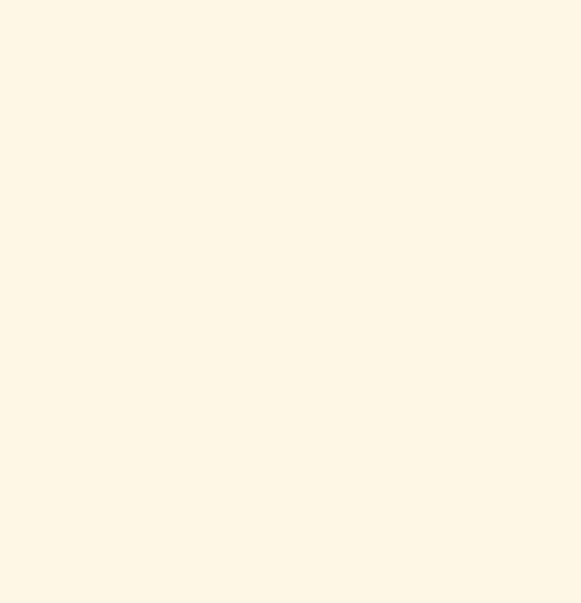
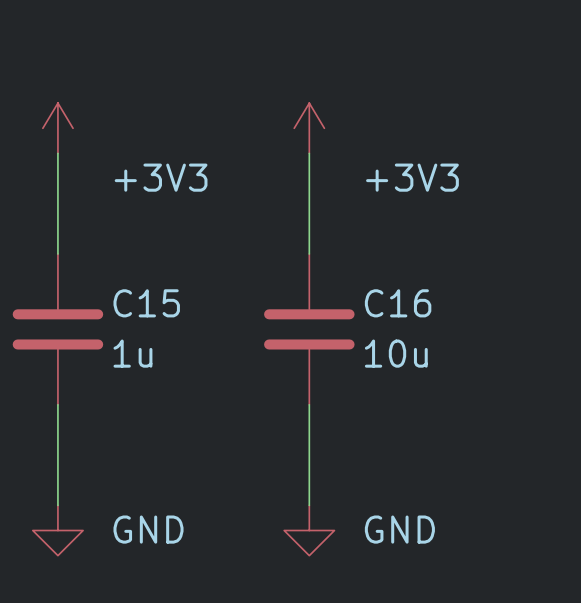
power symbol: none -> +3V3 (57, 128)
power symbol: none -> +3V3 (309, 128)
wire: none -> (57, 153) (57, 253)
wire: none -> (309, 153) (309, 253)
C15: none -> 1u (57, 329)
C16: none -> 10u (309, 329)
wire: none -> (57, 404) (57, 505)
wire: none -> (309, 404) (309, 505)
power symbol: none -> GND (57, 530)
power symbol: none -> GND (309, 530)

